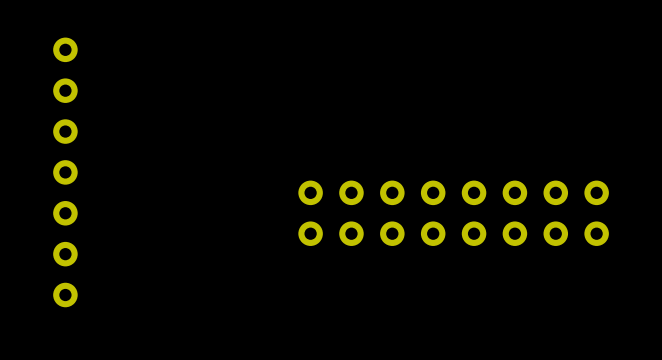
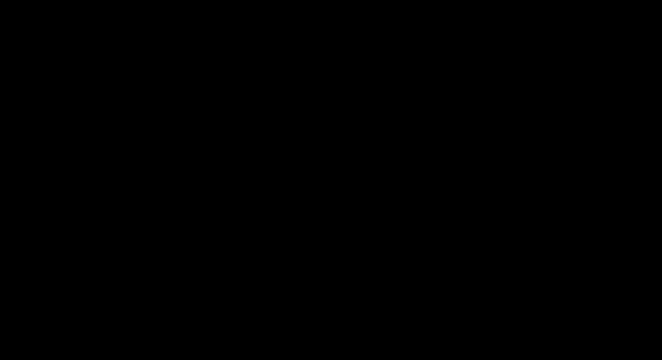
part: (65, 172) -> none
part: (453, 213) -> none

